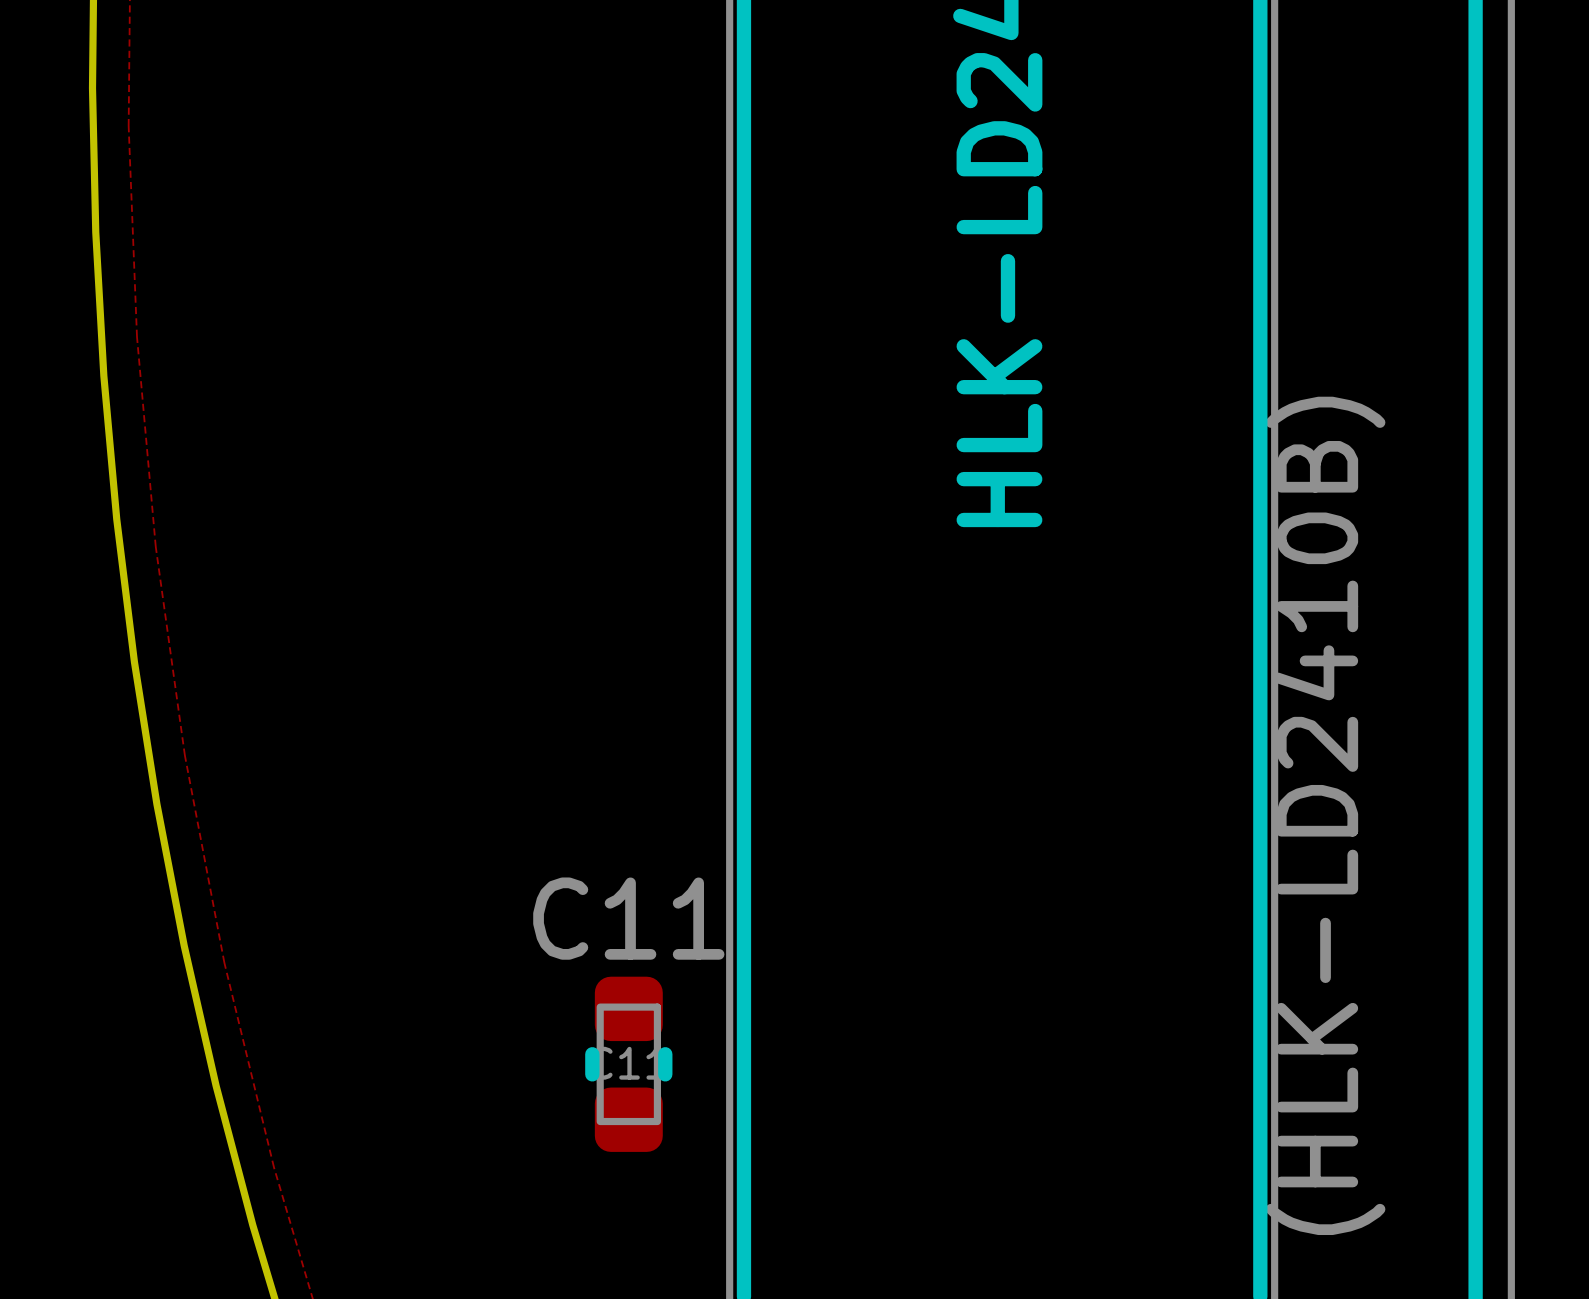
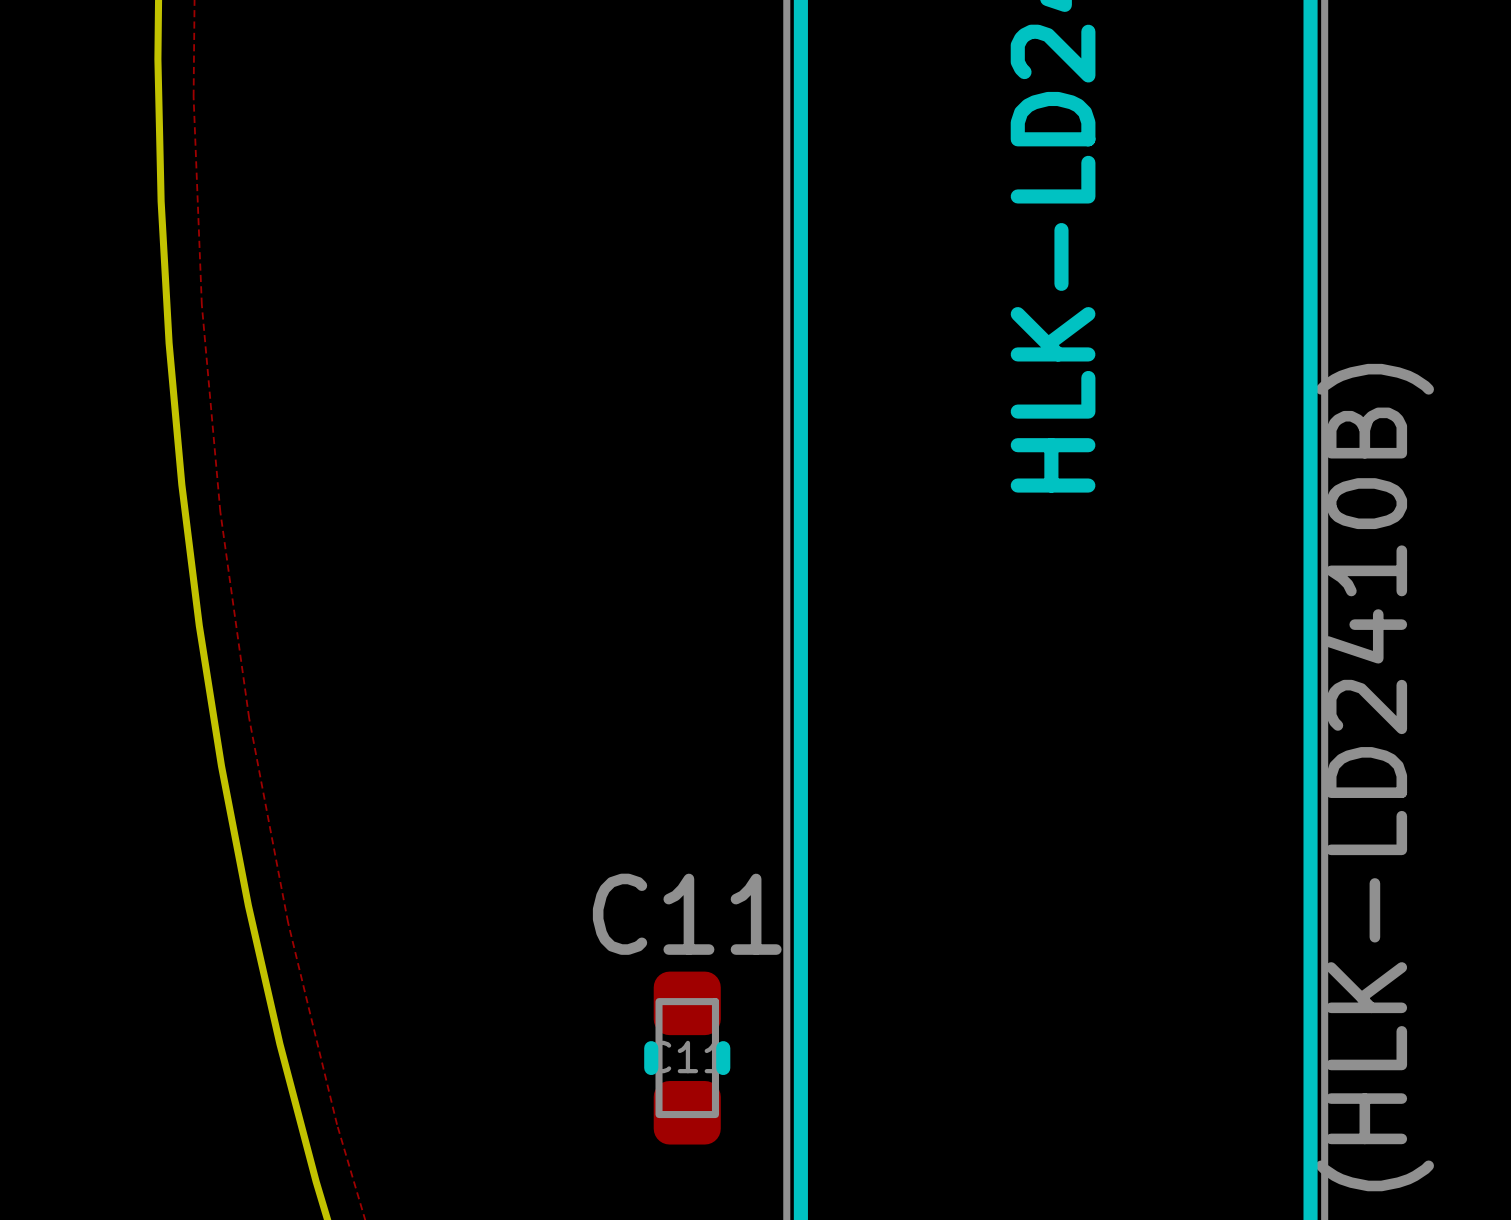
text position: C11 (628, 918) -> C11 (687, 914)
part position: (628, 1064) -> (687, 1058)

